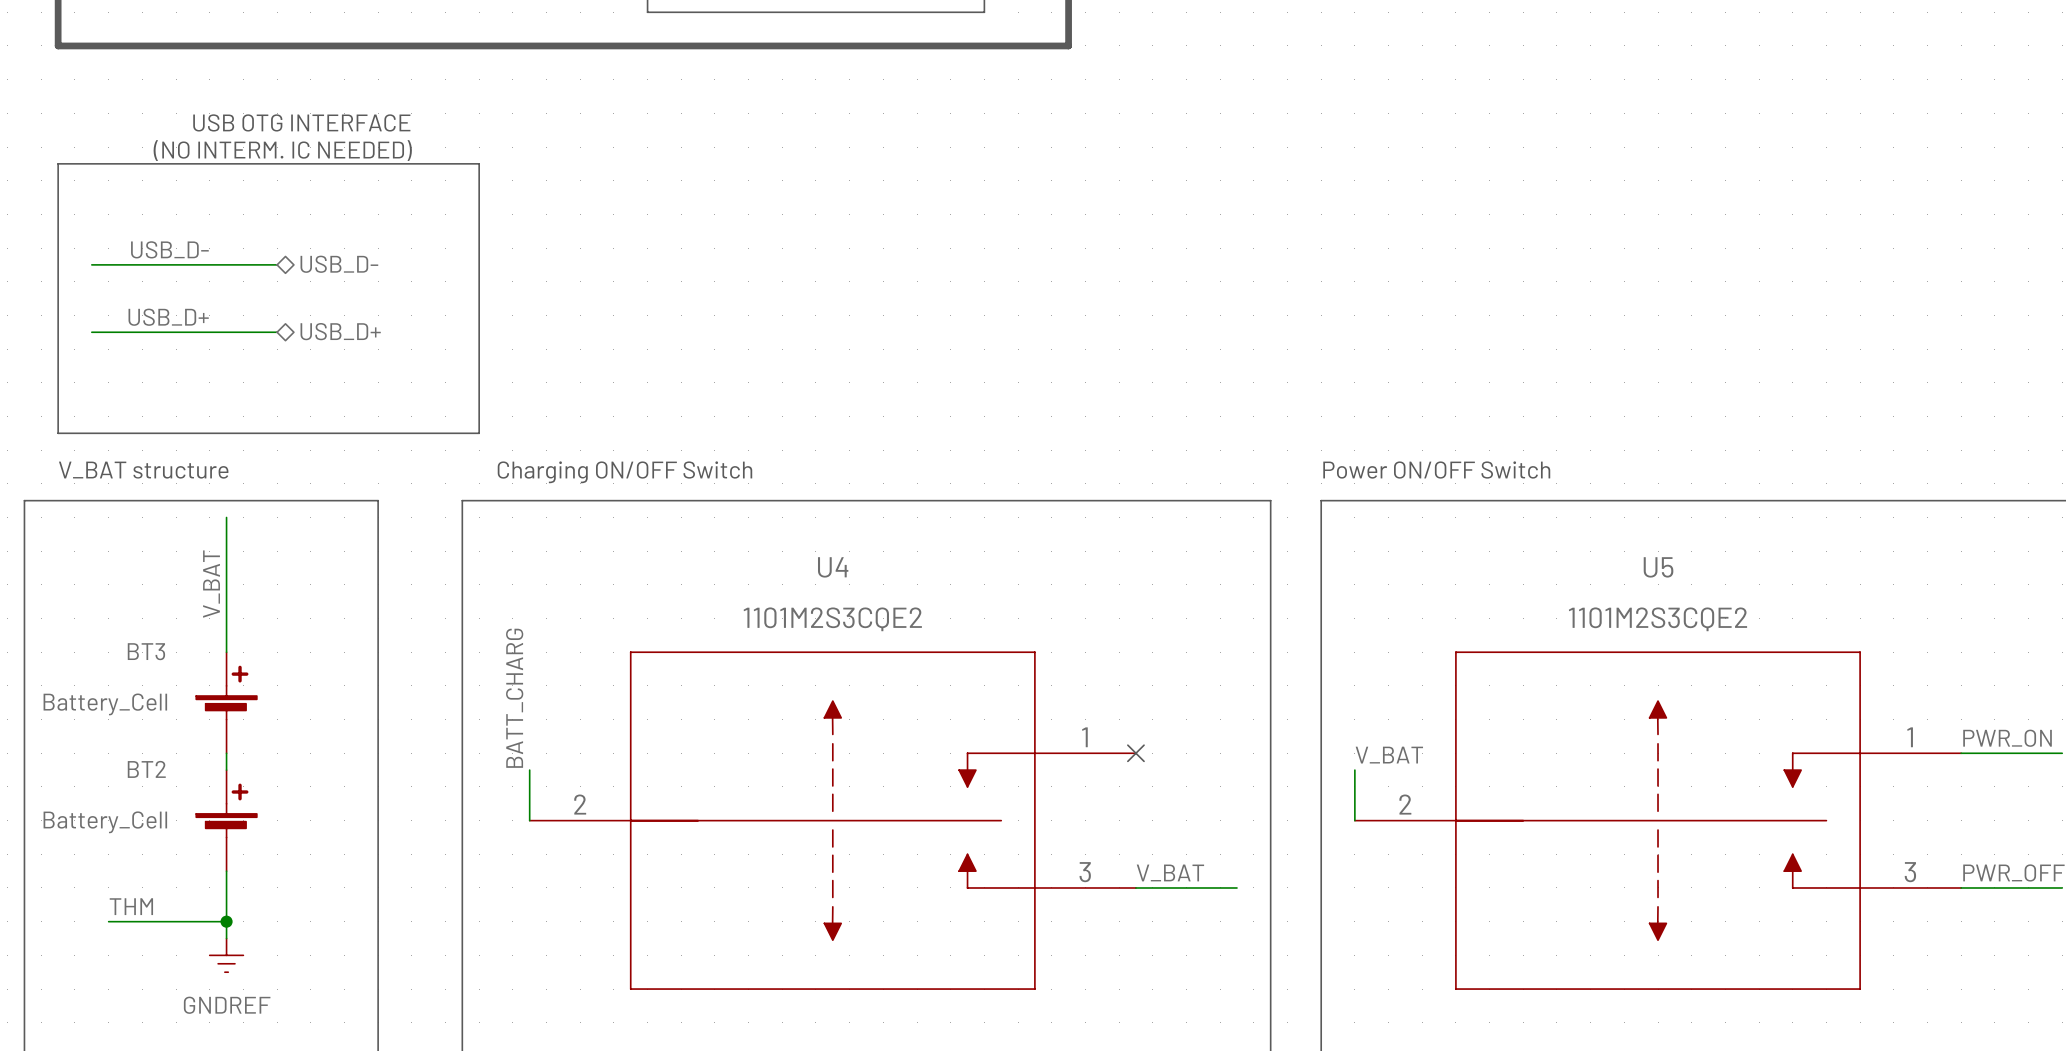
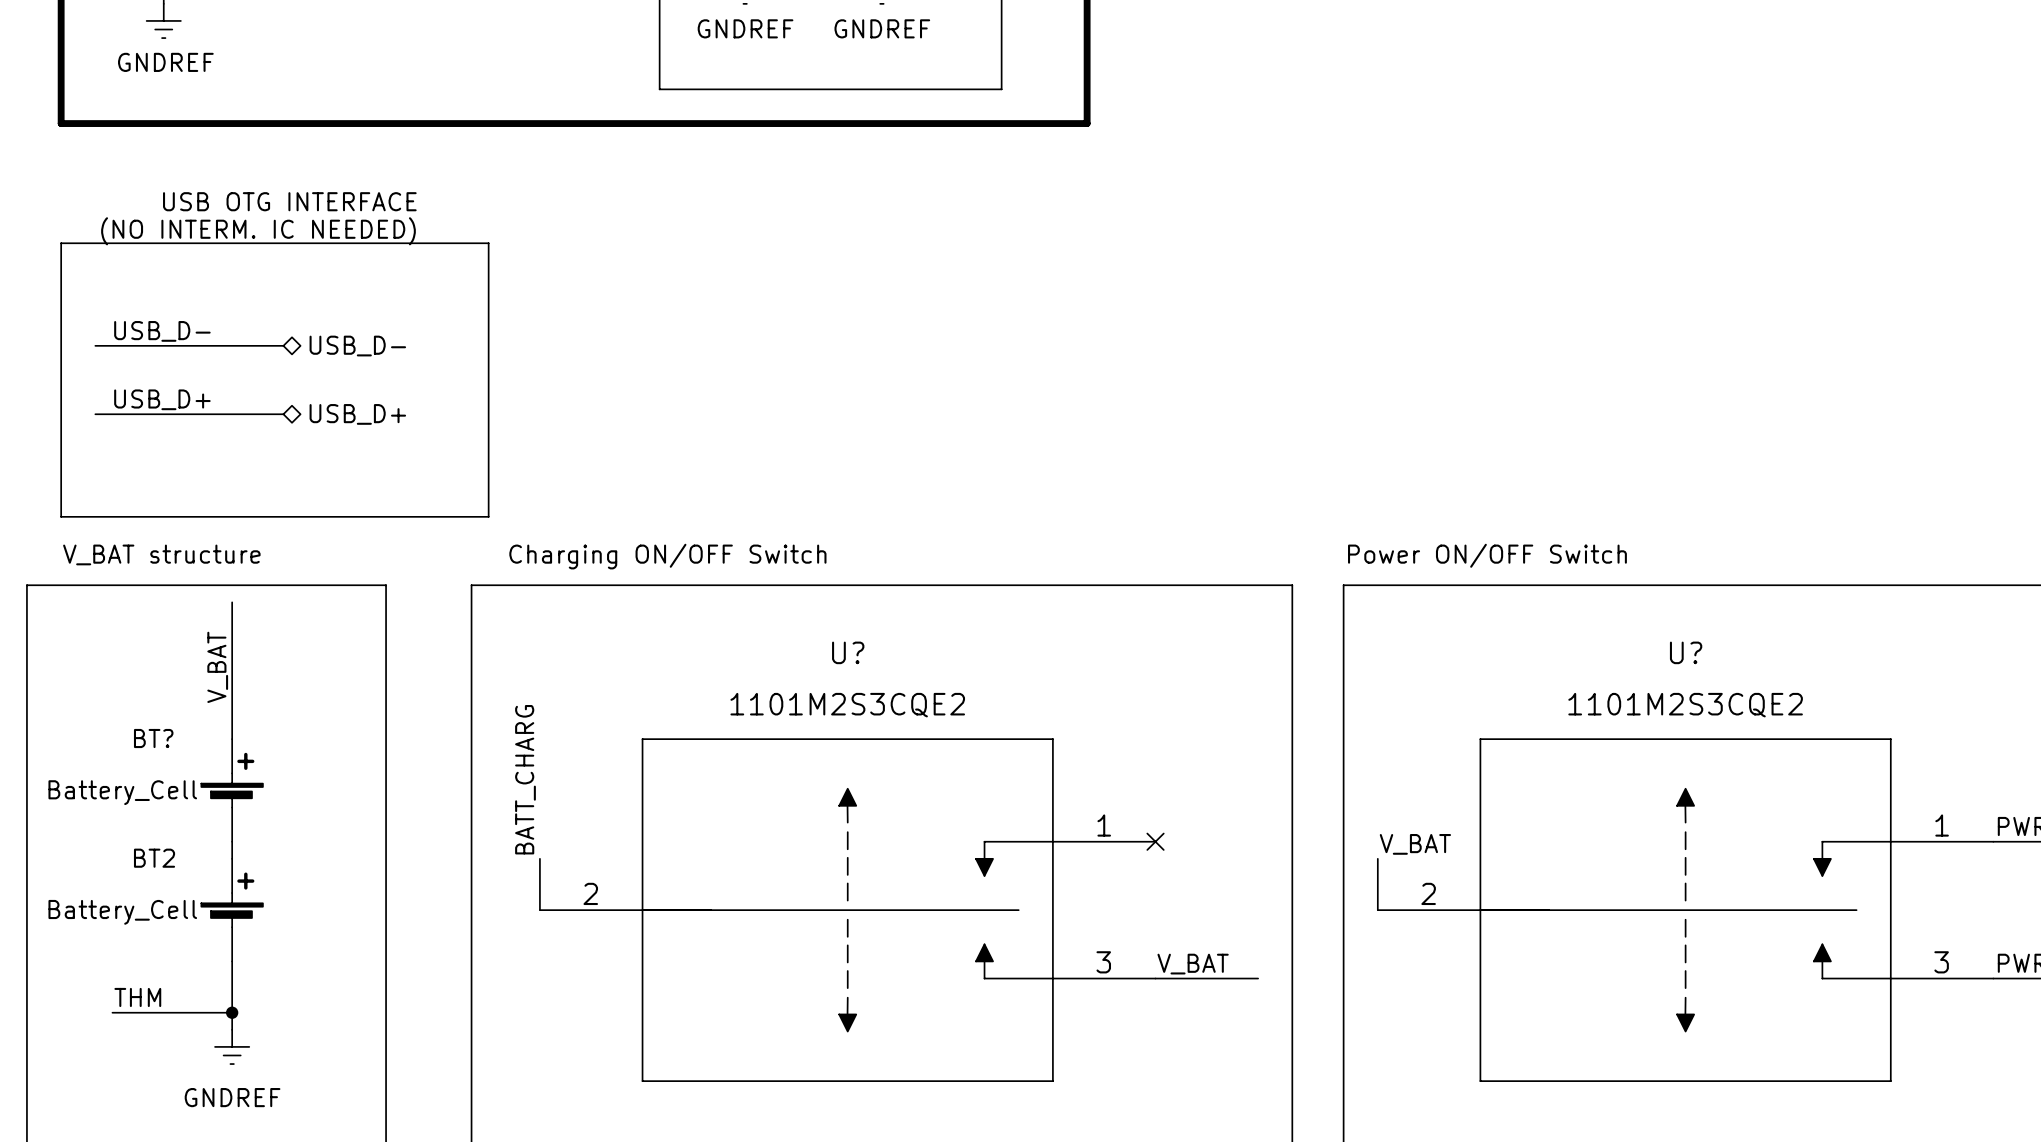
U4 name: U4 (833, 567) -> U? (848, 652)
U5 name: U5 (1658, 567) -> U? (1686, 652)
BT3 name: BT3 (146, 651) -> BT? (153, 738)

